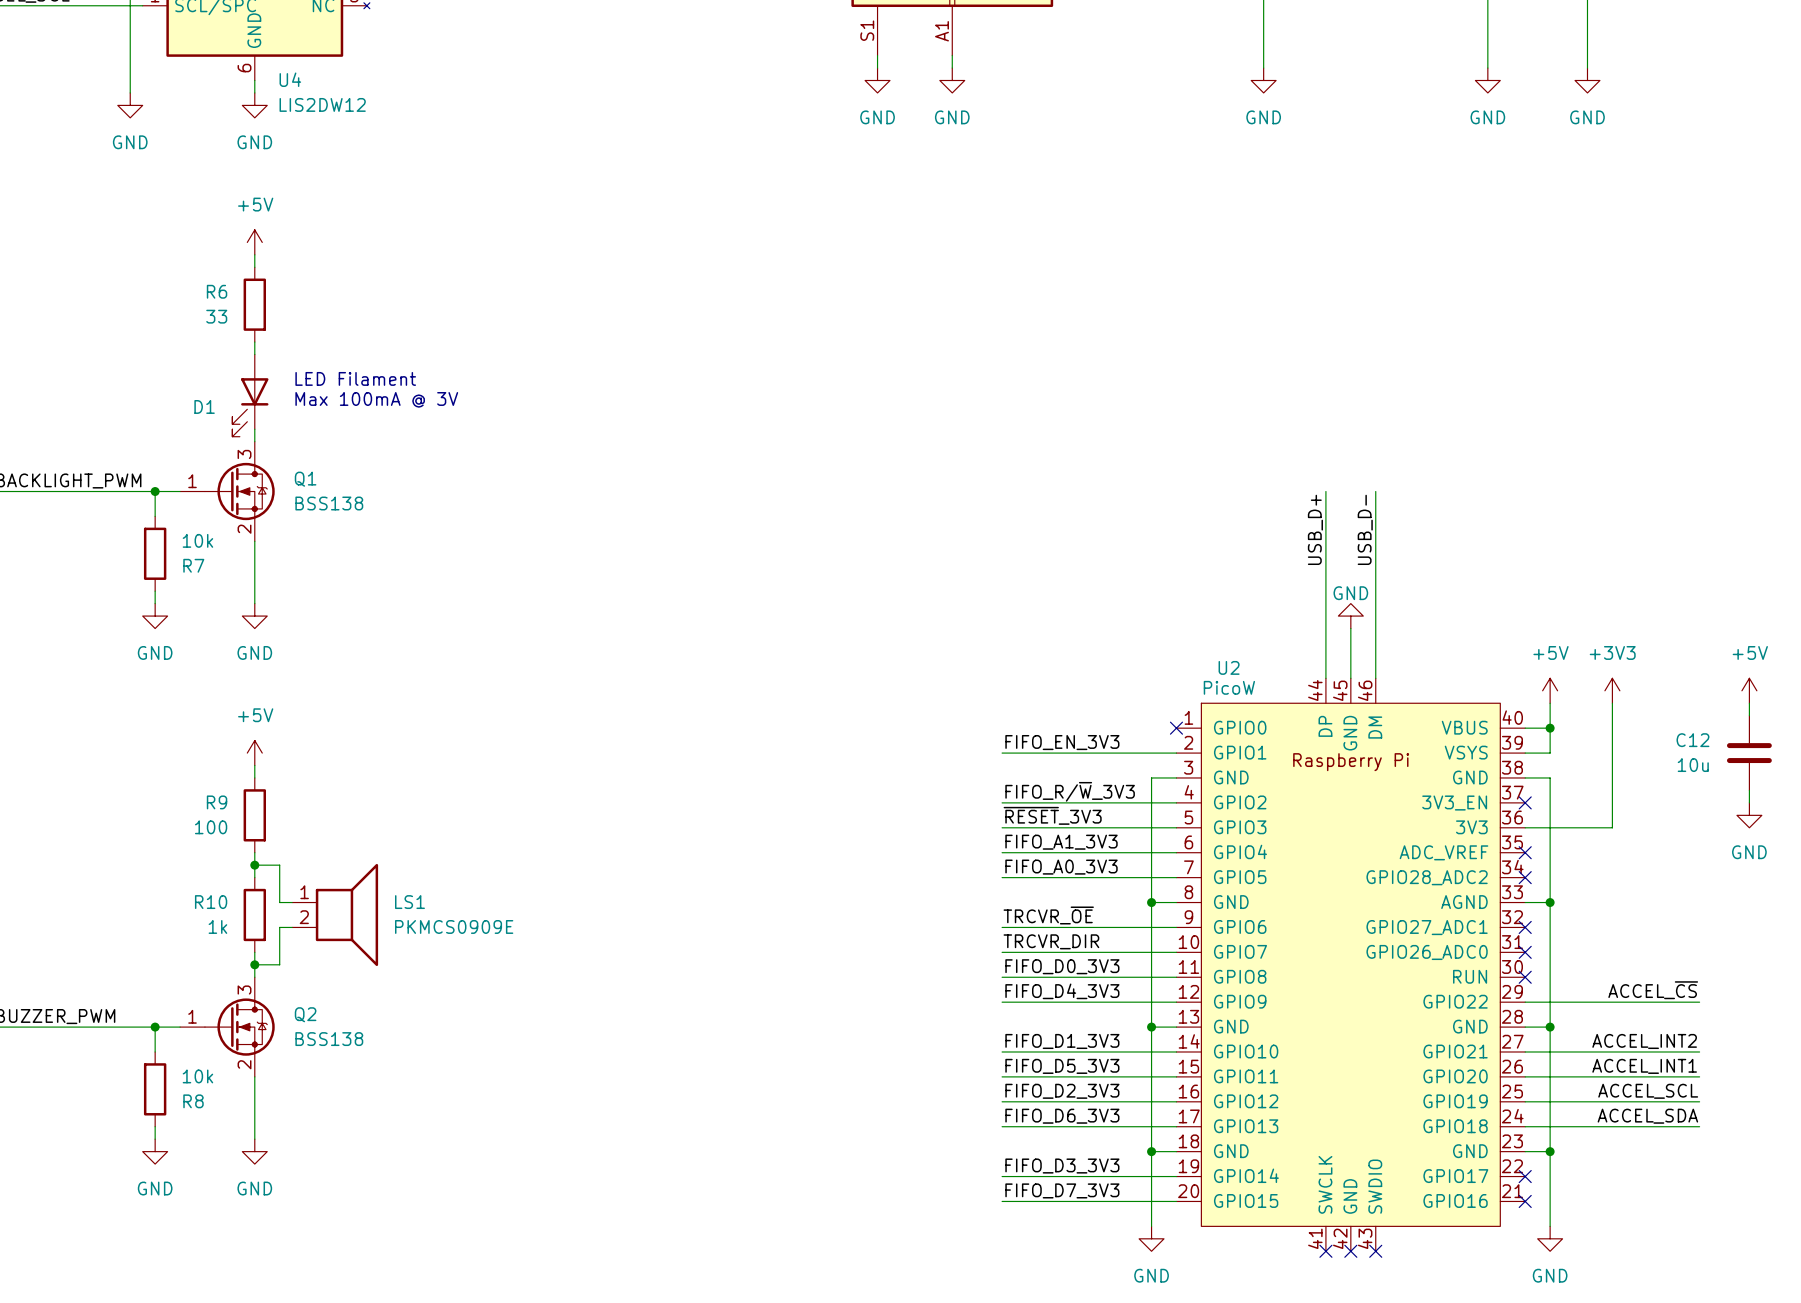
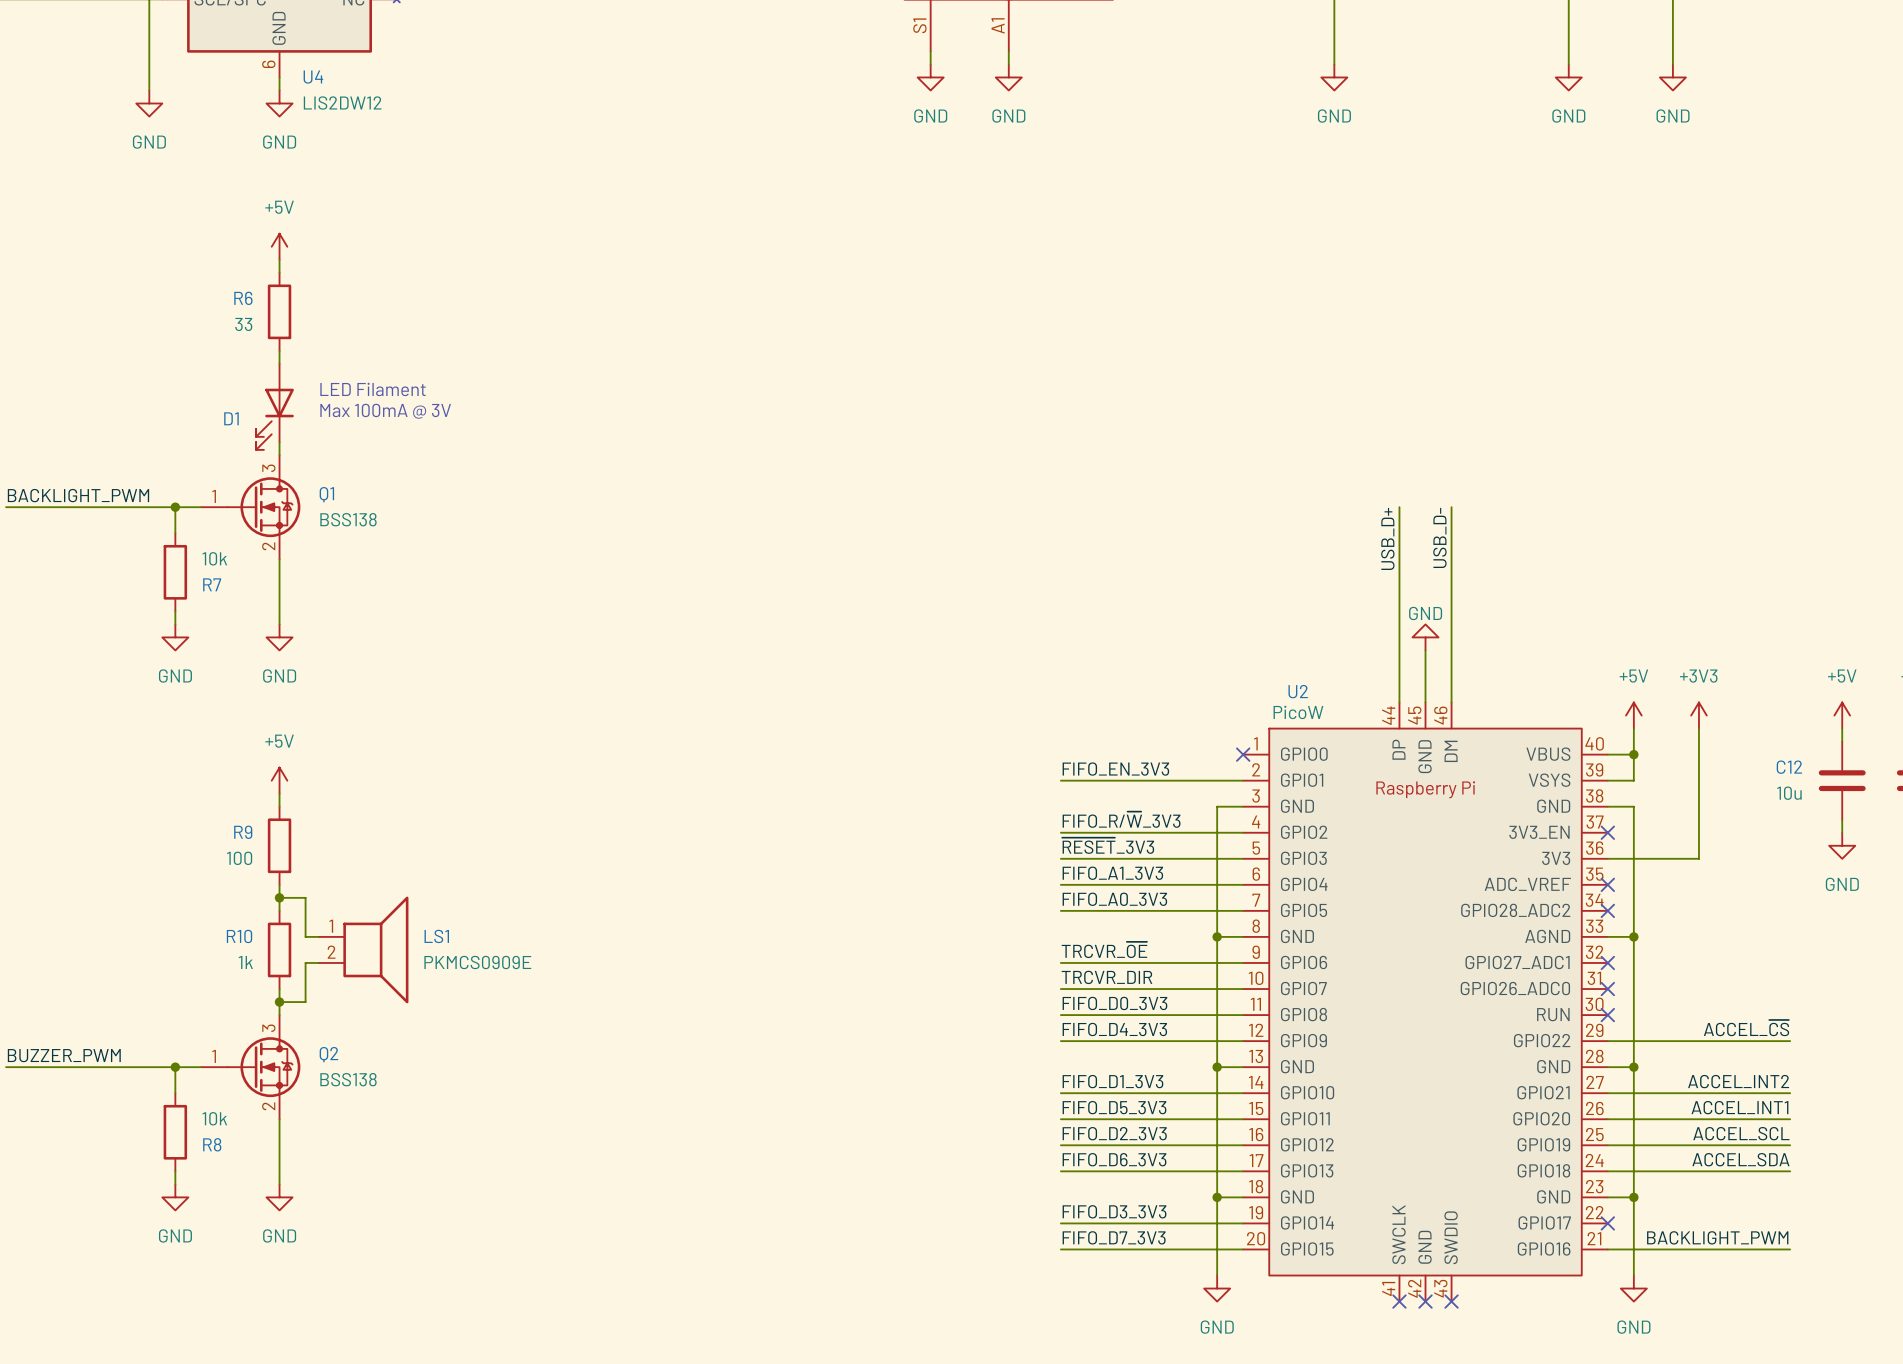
label: none -> BACKLIGHT_PWM (1717, 1237)
wire: none -> (1607, 1249) (1790, 1249)
no-connect mark: (1525, 1201) -> none

